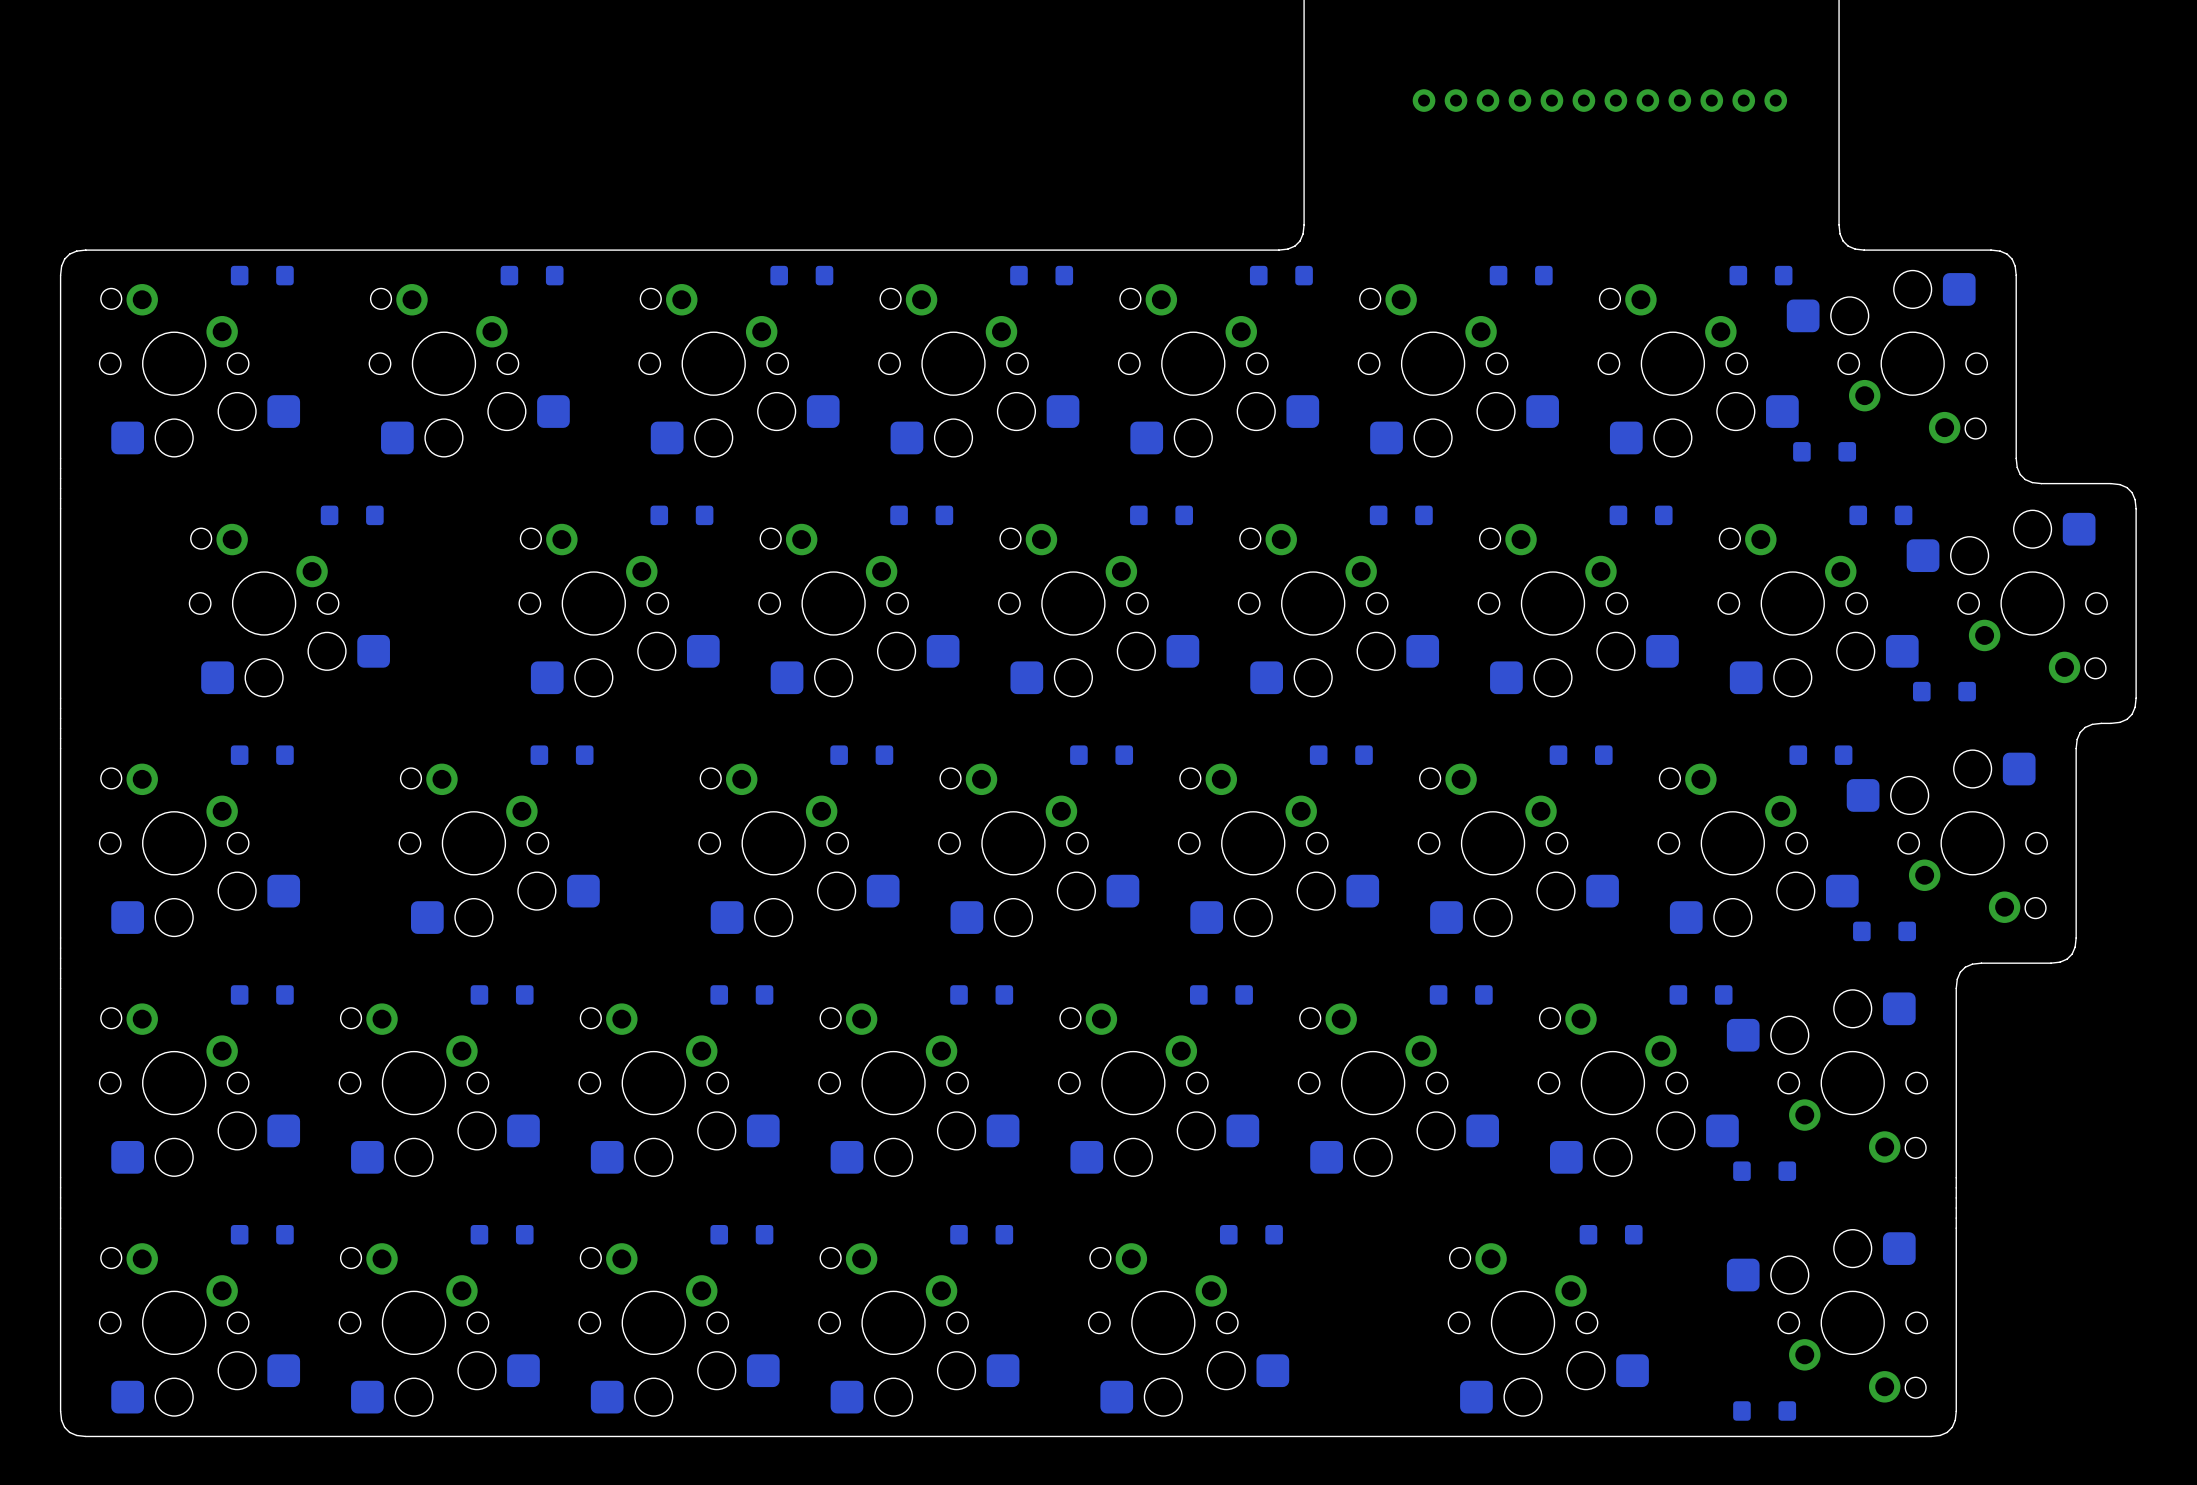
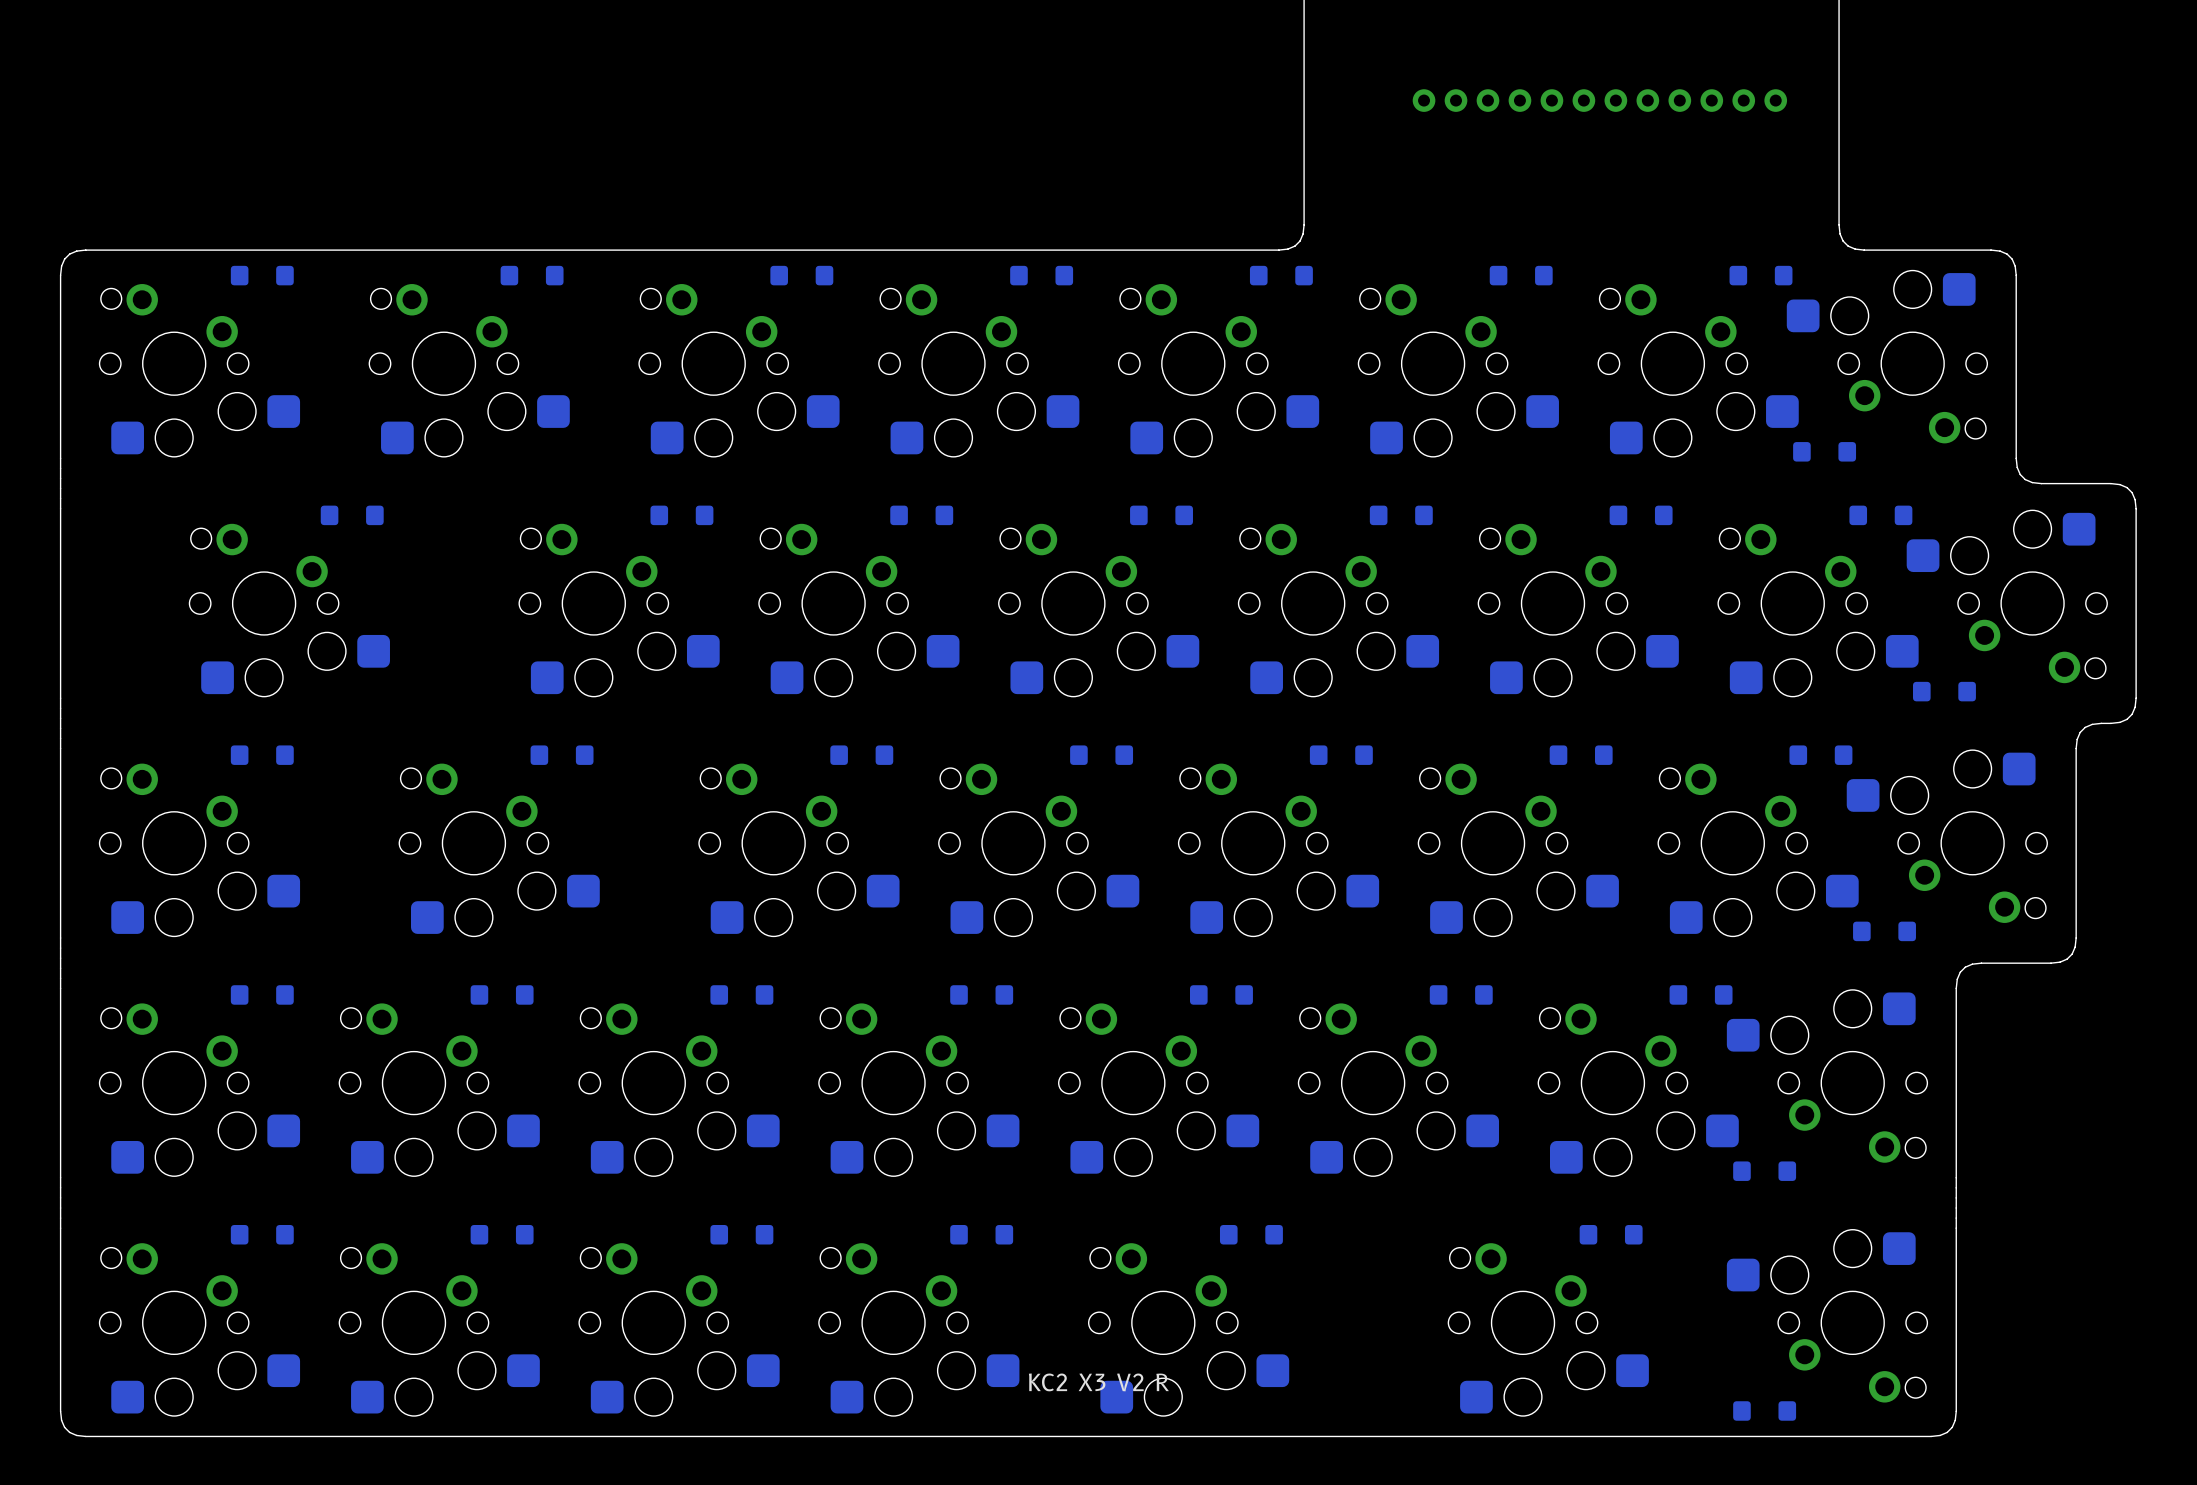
text: none -> KC2 X3 V2 R (1098, 1382)

